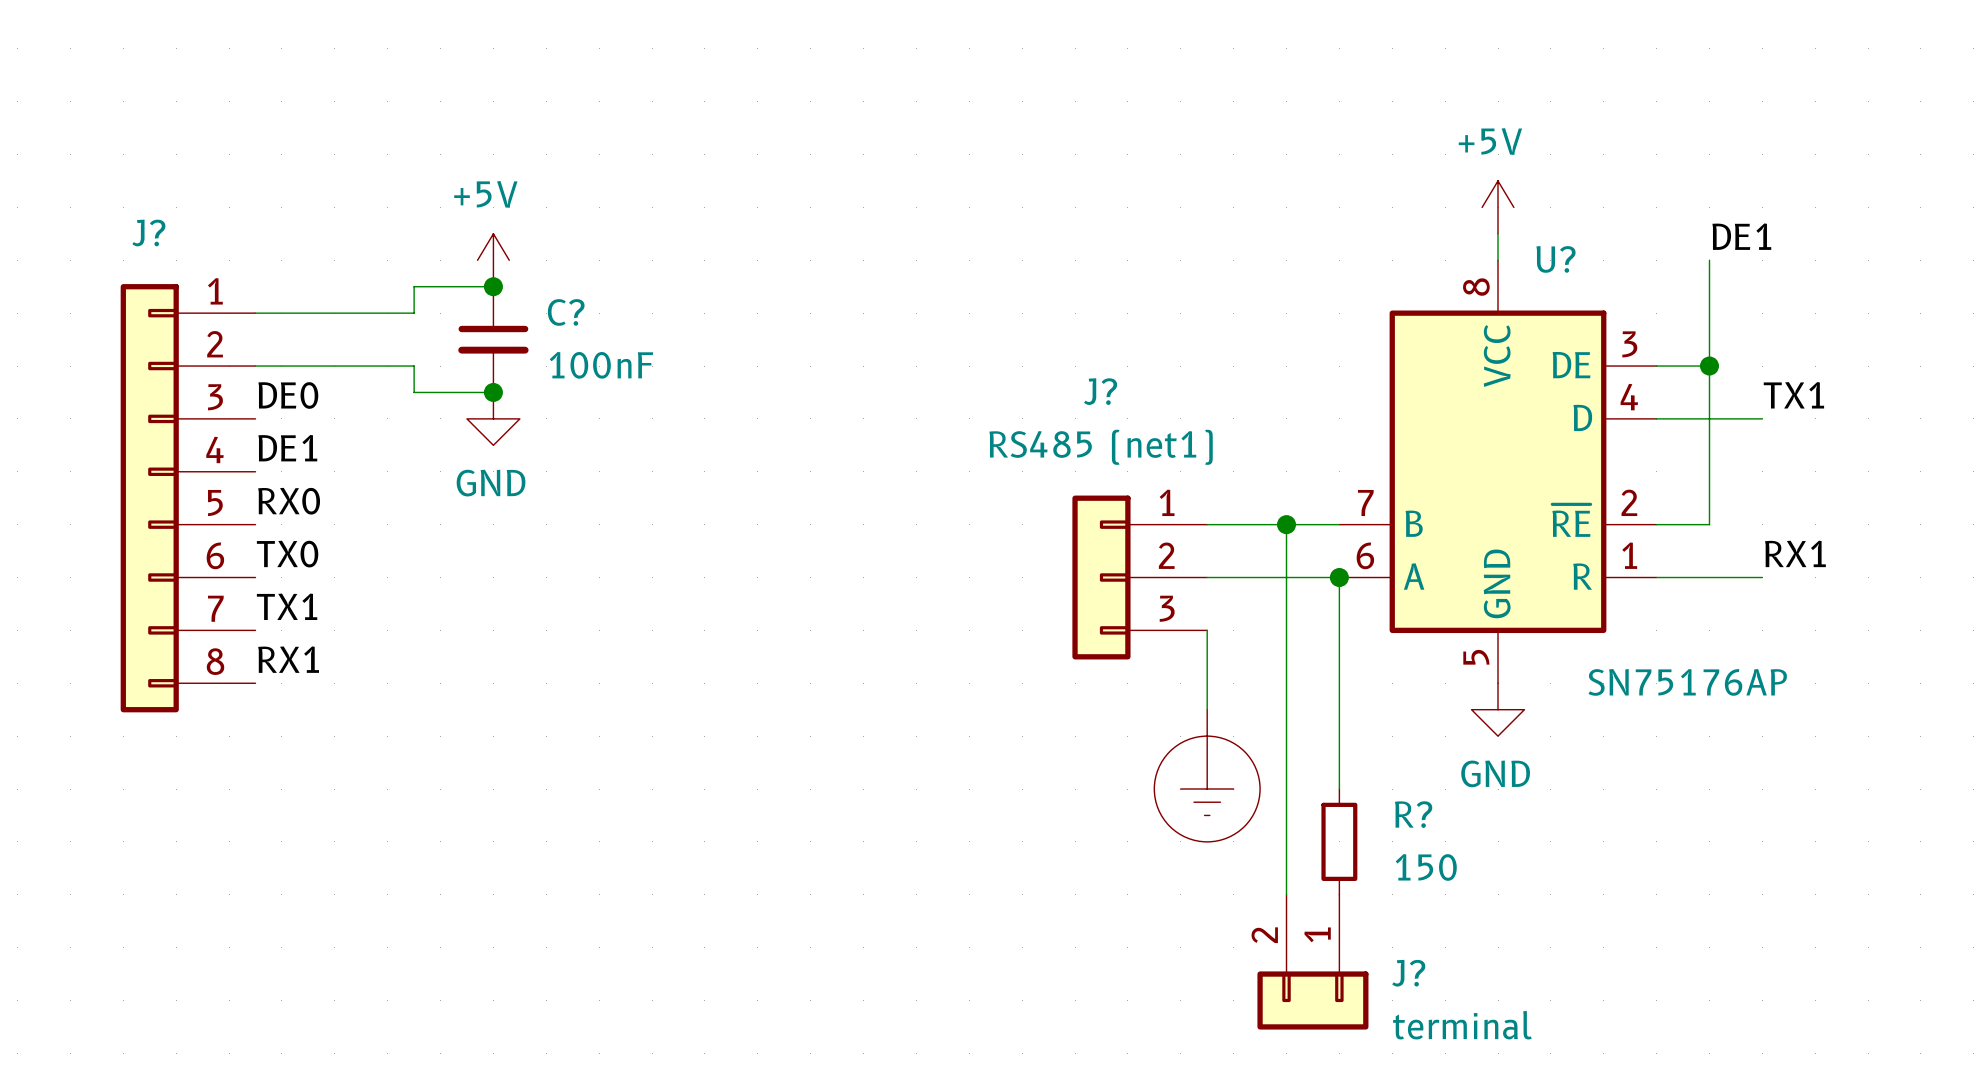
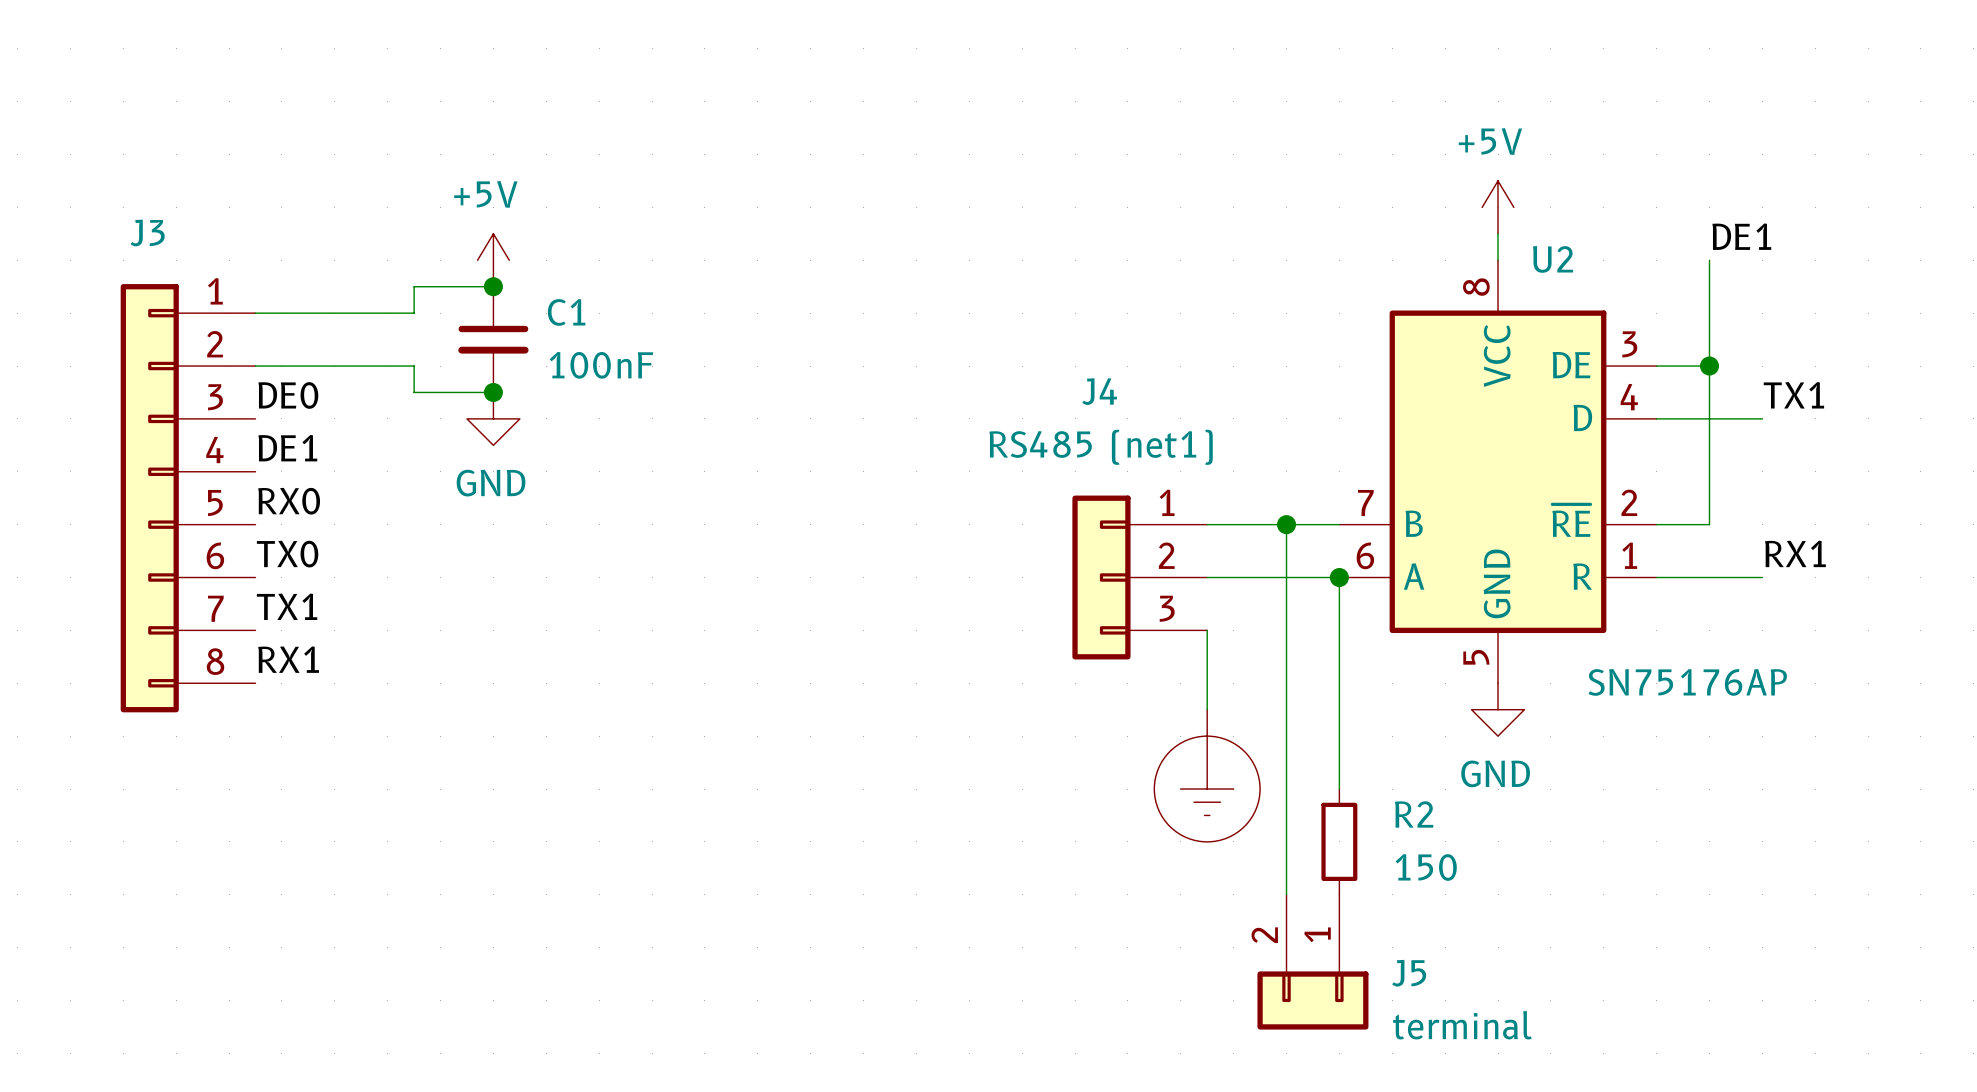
J? name: J? (148, 233) -> J3 (147, 233)
U? name: U? (1556, 259) -> U2 (1553, 259)
C? name: C? (566, 312) -> C1 (566, 312)
J? name: J? (1100, 391) -> J4 (1099, 391)
R? name: R? (1413, 814) -> R2 (1414, 814)
J? name: J? (1408, 973) -> J5 (1409, 973)

